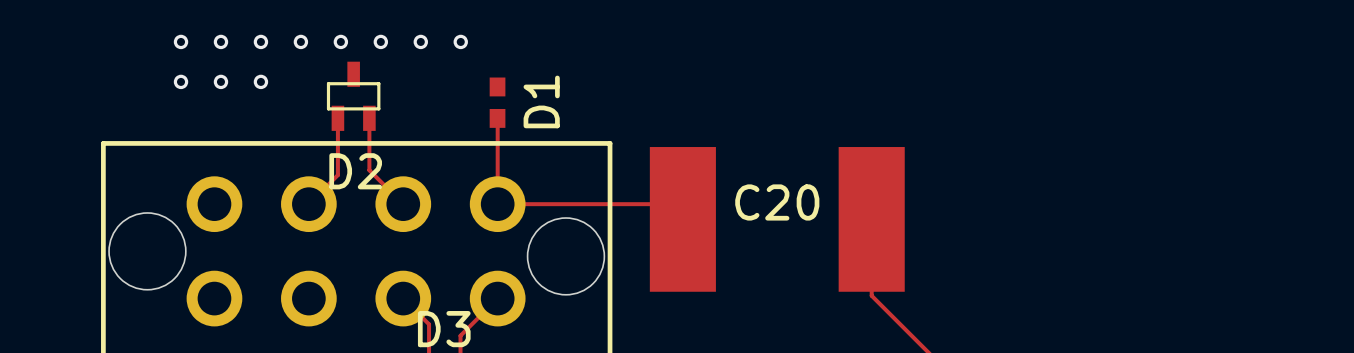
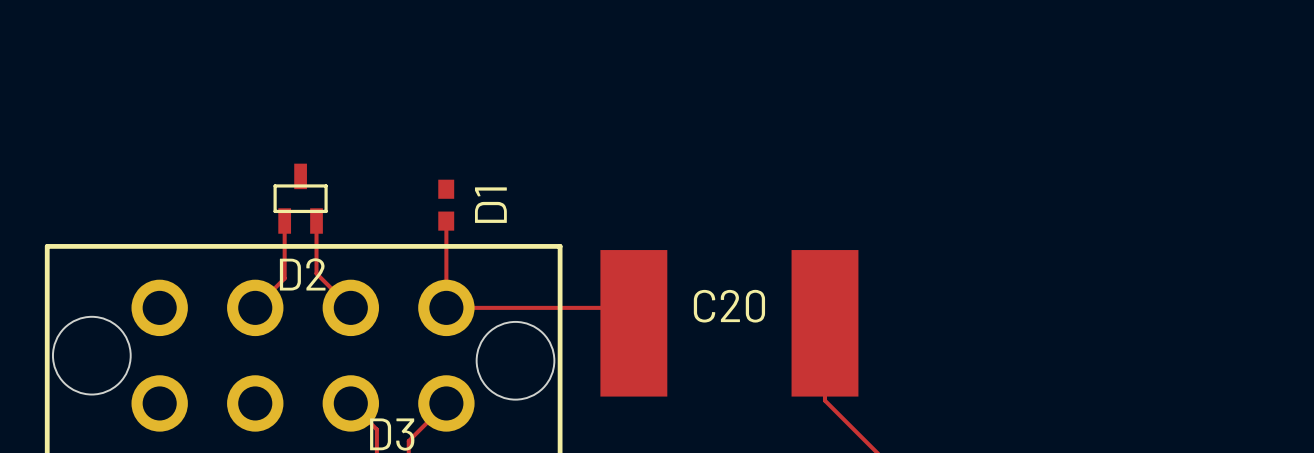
via: (181, 41) -> none
via: (220, 41) -> none
via: (260, 41) -> none
via: (300, 41) -> none
via: (340, 41) -> none
via: (380, 41) -> none
via: (420, 41) -> none
via: (460, 41) -> none
via: (181, 81) -> none
via: (220, 81) -> none
via: (260, 81) -> none

